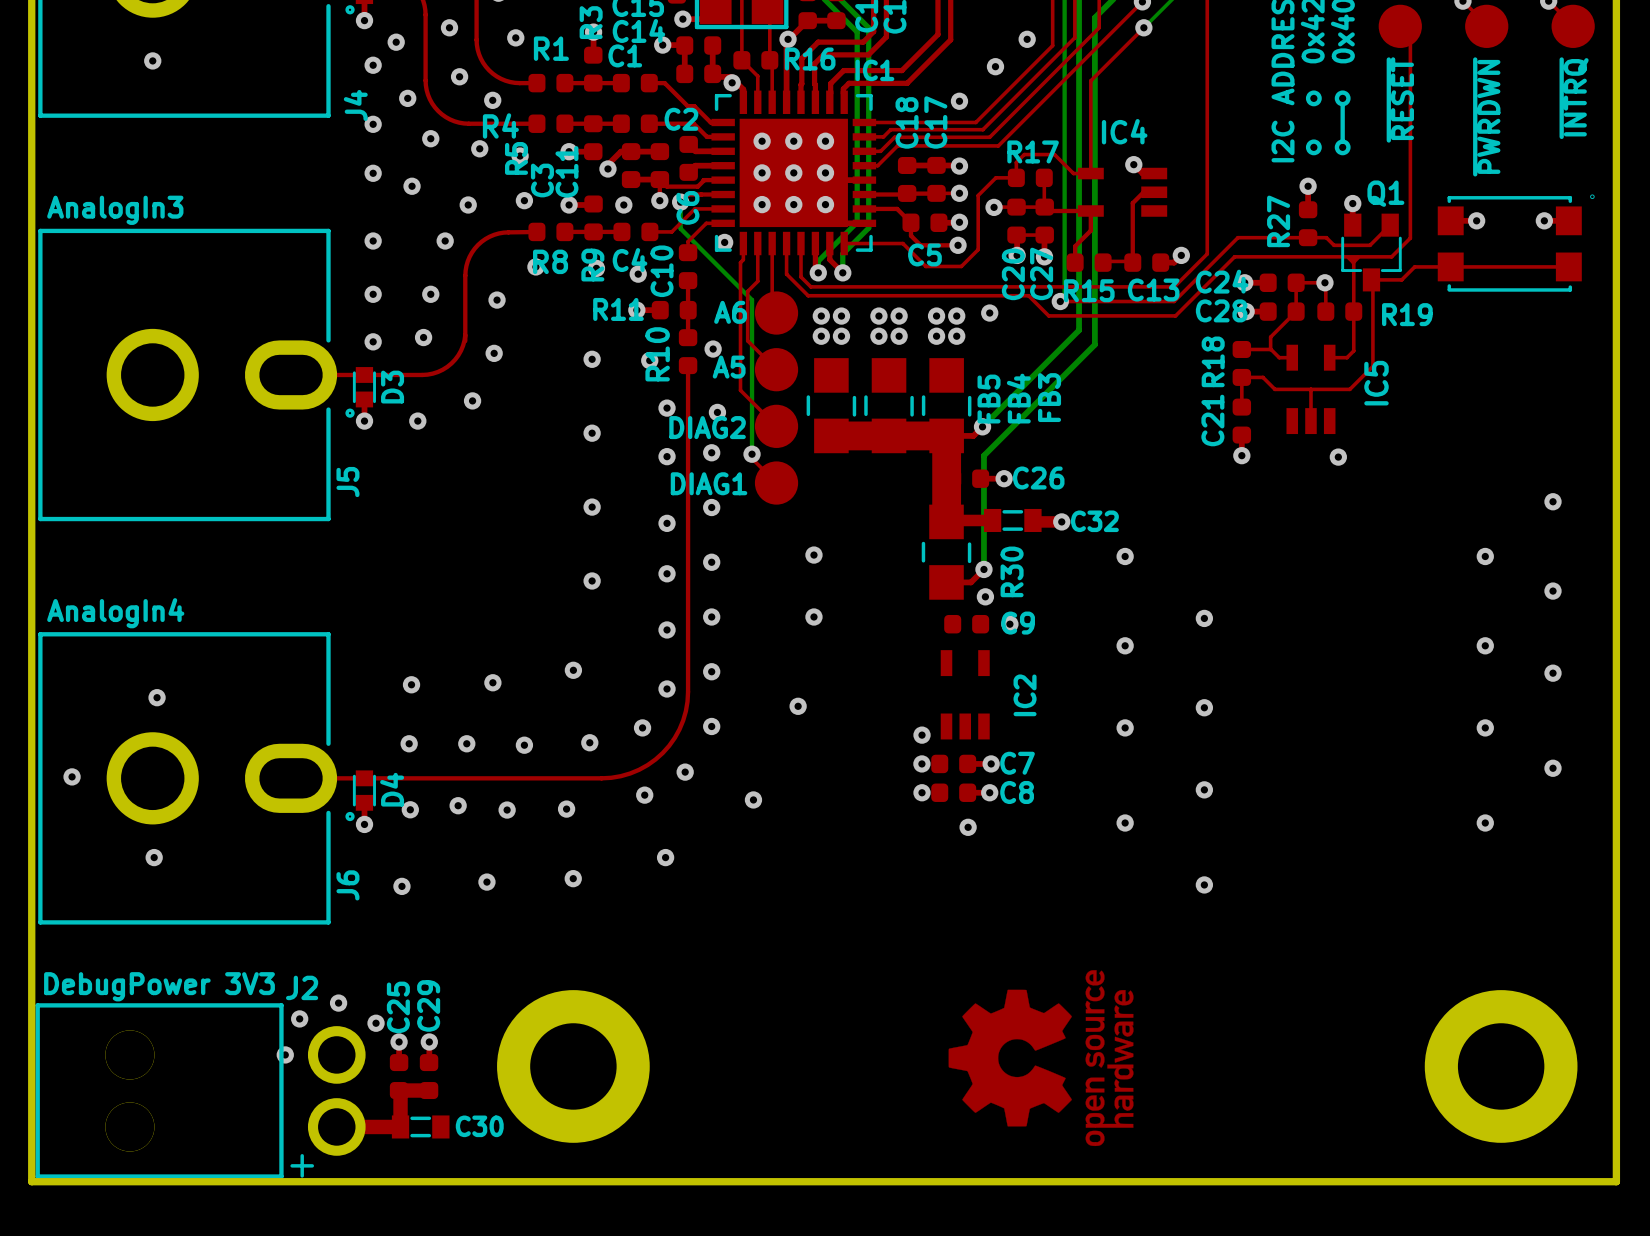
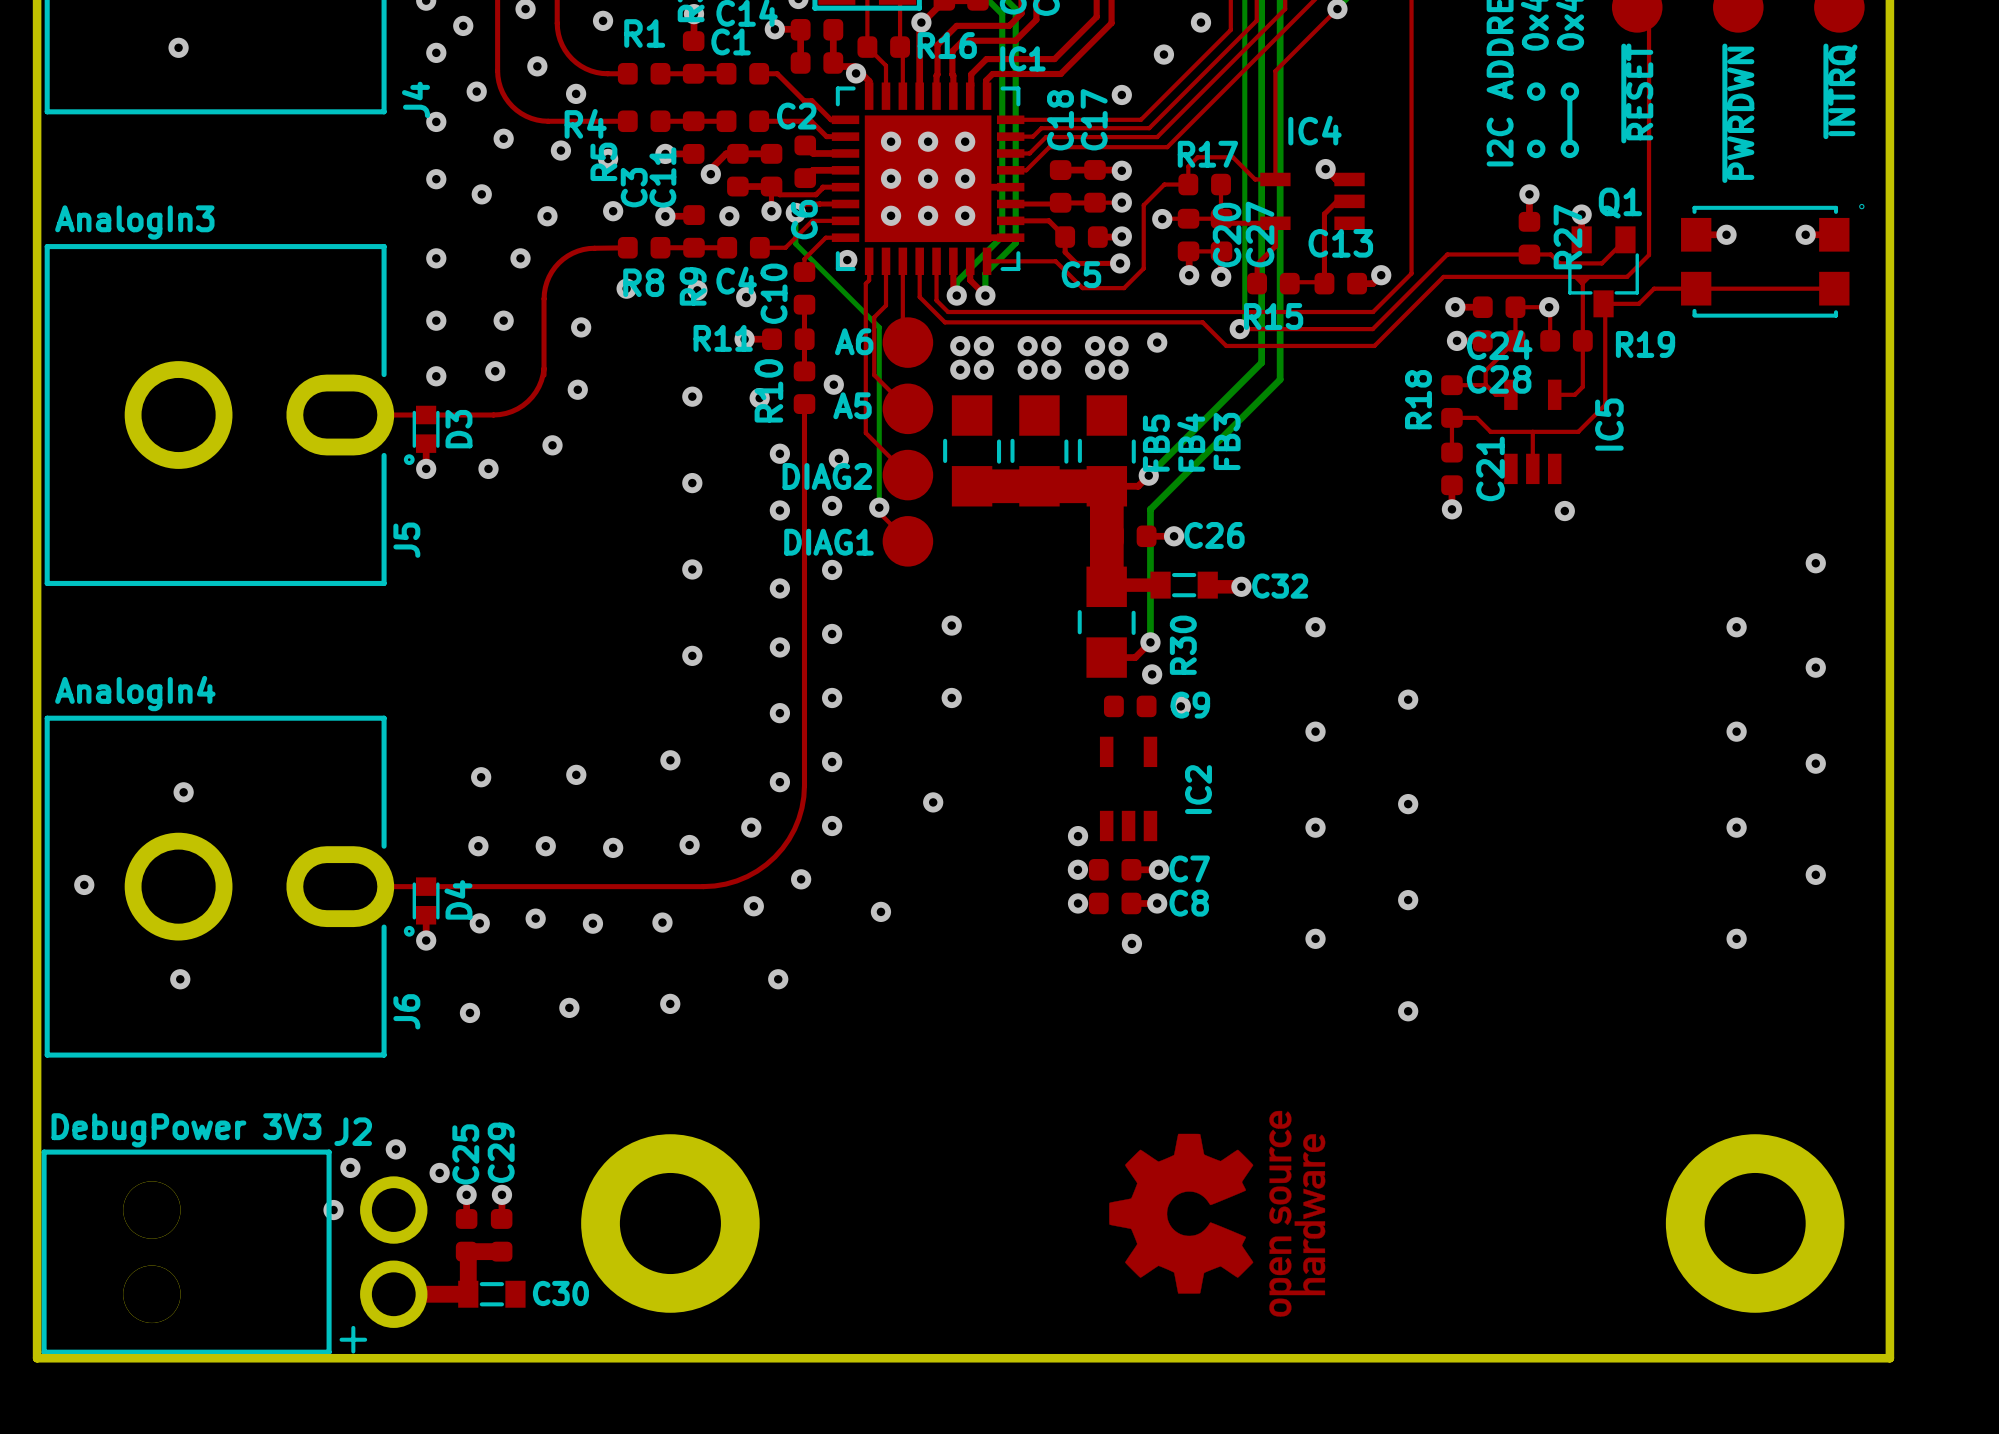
R27 name position: R27 (1278, 221) -> R27 (1567, 237)
C27 name position: C27 (1041, 273) -> C27 (1260, 234)
C20 name position: C20 (1013, 274) -> C20 (1227, 235)
C24 name position: C24 (1222, 281) -> C24 (1499, 345)
C13 name position: C13 (1153, 290) -> C13 (1340, 243)
C28 name position: C28 (1221, 310) -> C28 (1499, 379)
C21 name position: C21 (1212, 420) -> C21 (1490, 468)

